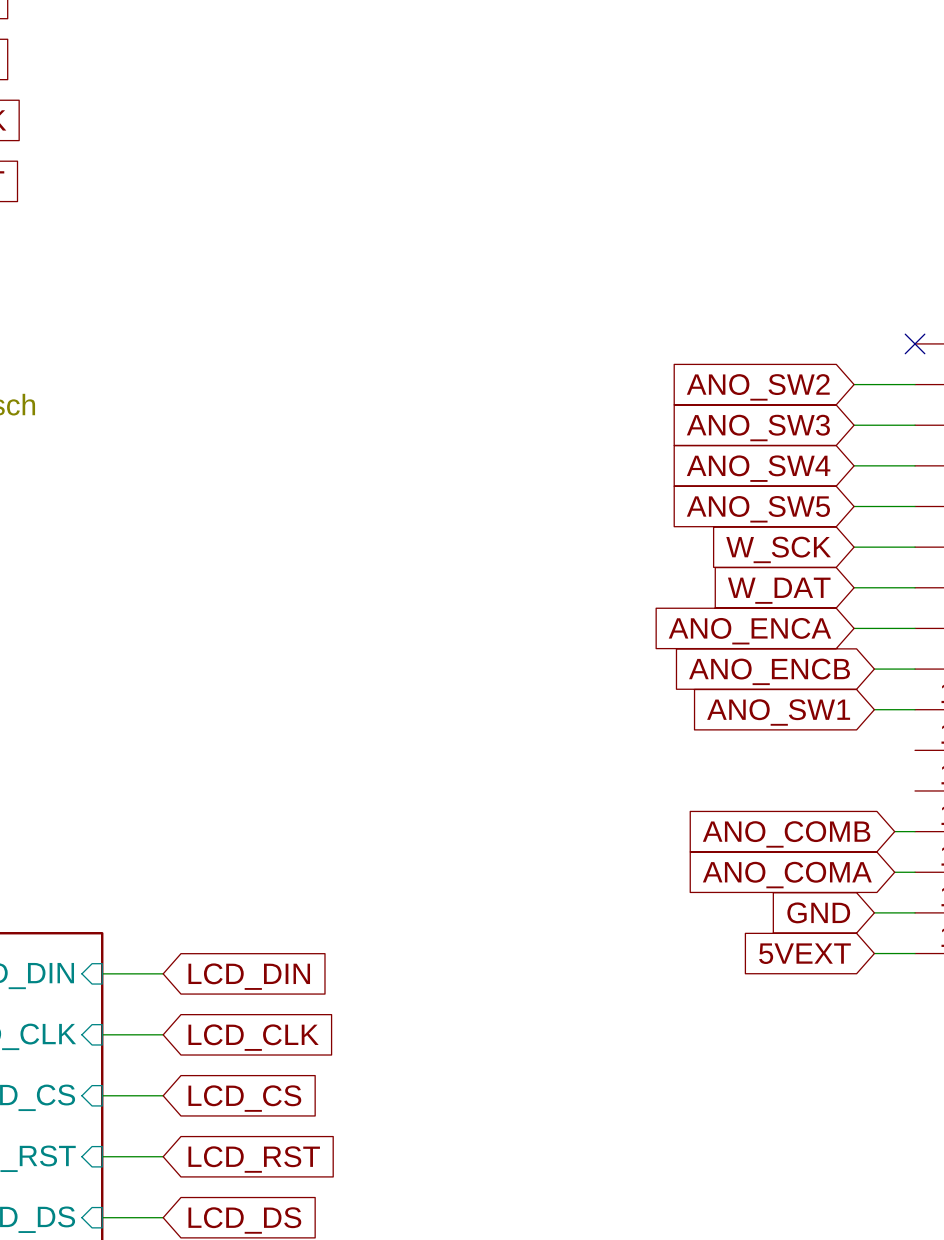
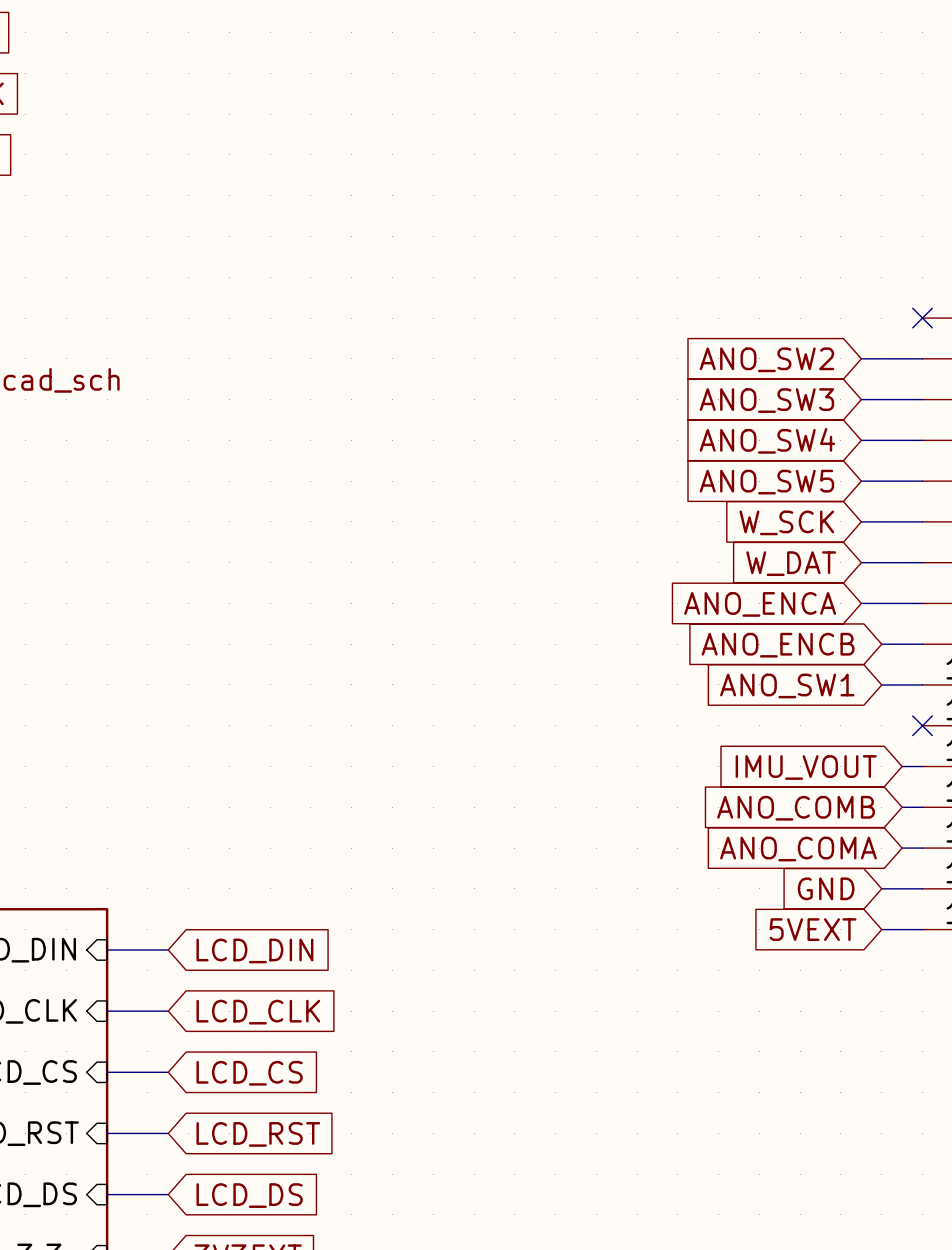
no-connect mark: none -> (922, 725)
wire: none -> (902, 766) (922, 766)
global label: none -> IMU_VOUT (806, 767)

